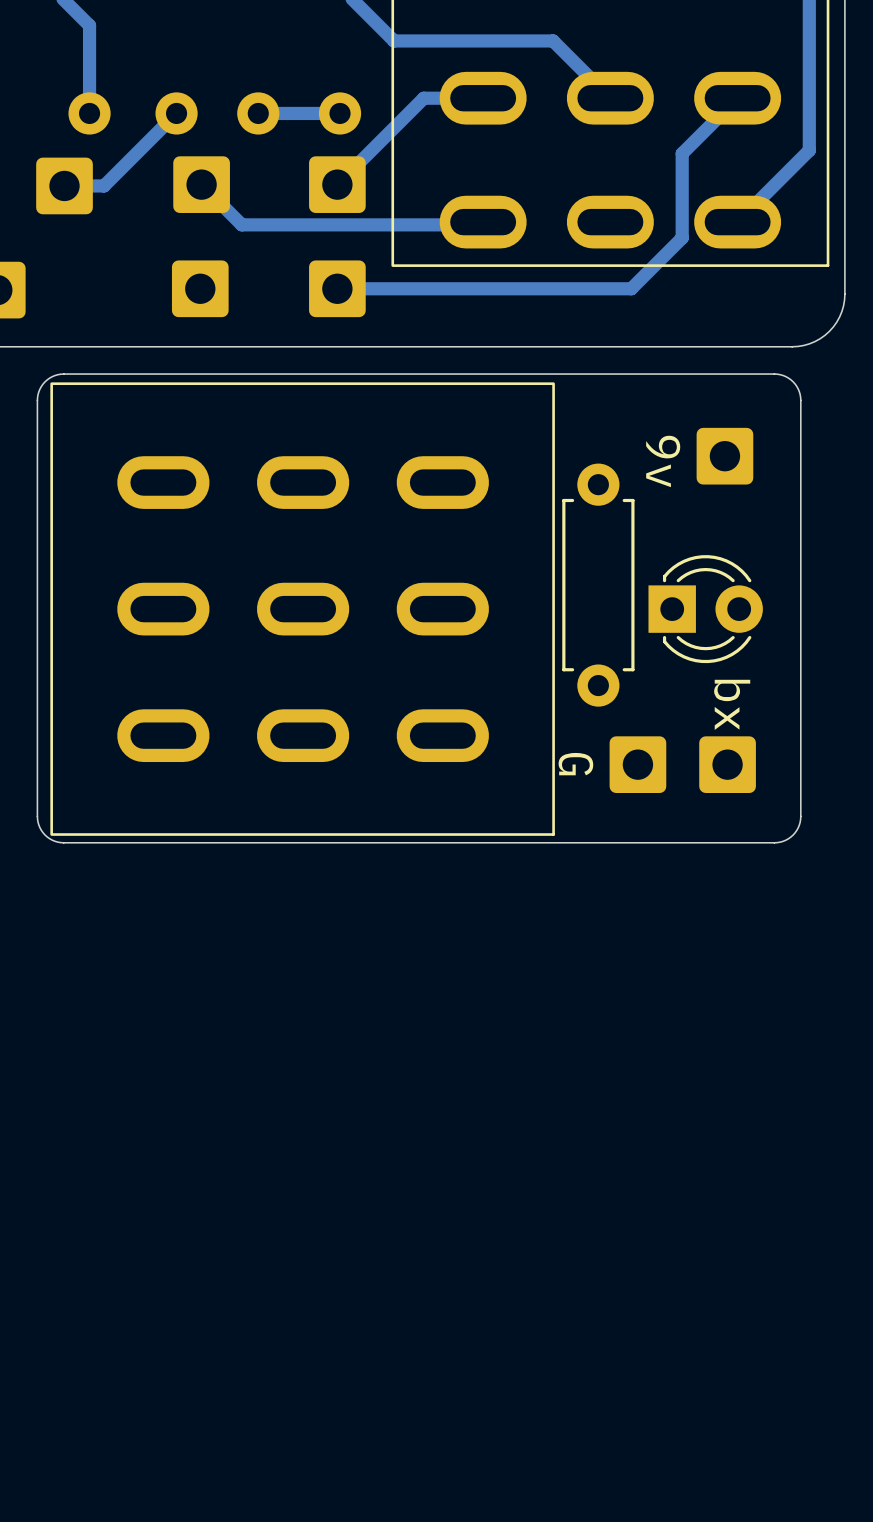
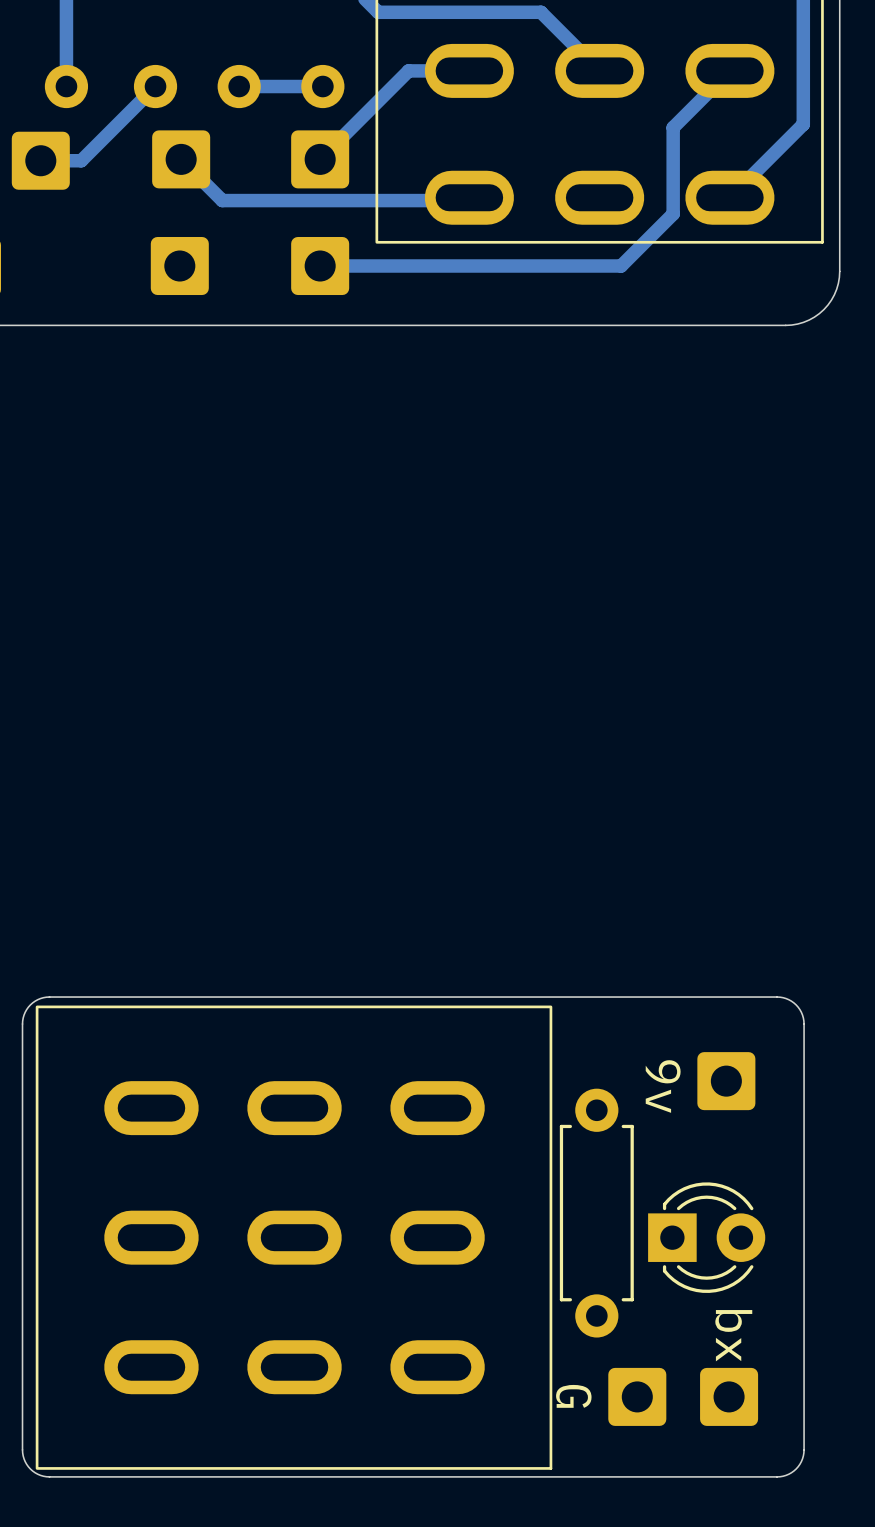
board edge: (774, 374) (63, 374) (49, 378) (41, 386) (37, 400) (37, 816) (41, 830) (49, 838) (63, 842) (774, 842) (788, 838) (798, 827) (800, 816) (800, 400) (798, 388) (793, 381) (783, 375) (774, 374) -> (777, 997) (49, 997) (35, 1001) (26, 1009) (22, 1024) (22, 1449) (26, 1464) (35, 1472) (49, 1476) (777, 1476) (791, 1472) (801, 1461) (804, 1449) (804, 1024) (802, 1015) (796, 1004) (785, 998) (777, 997)
part position: (724, 456) -> (726, 1081)
part position: (598, 585) -> (596, 1213)
part position: (302, 609) -> (294, 1237)
part position: (705, 609) -> (706, 1237)
part position: (637, 764) -> (637, 1396)
part position: (727, 764) -> (729, 1396)

